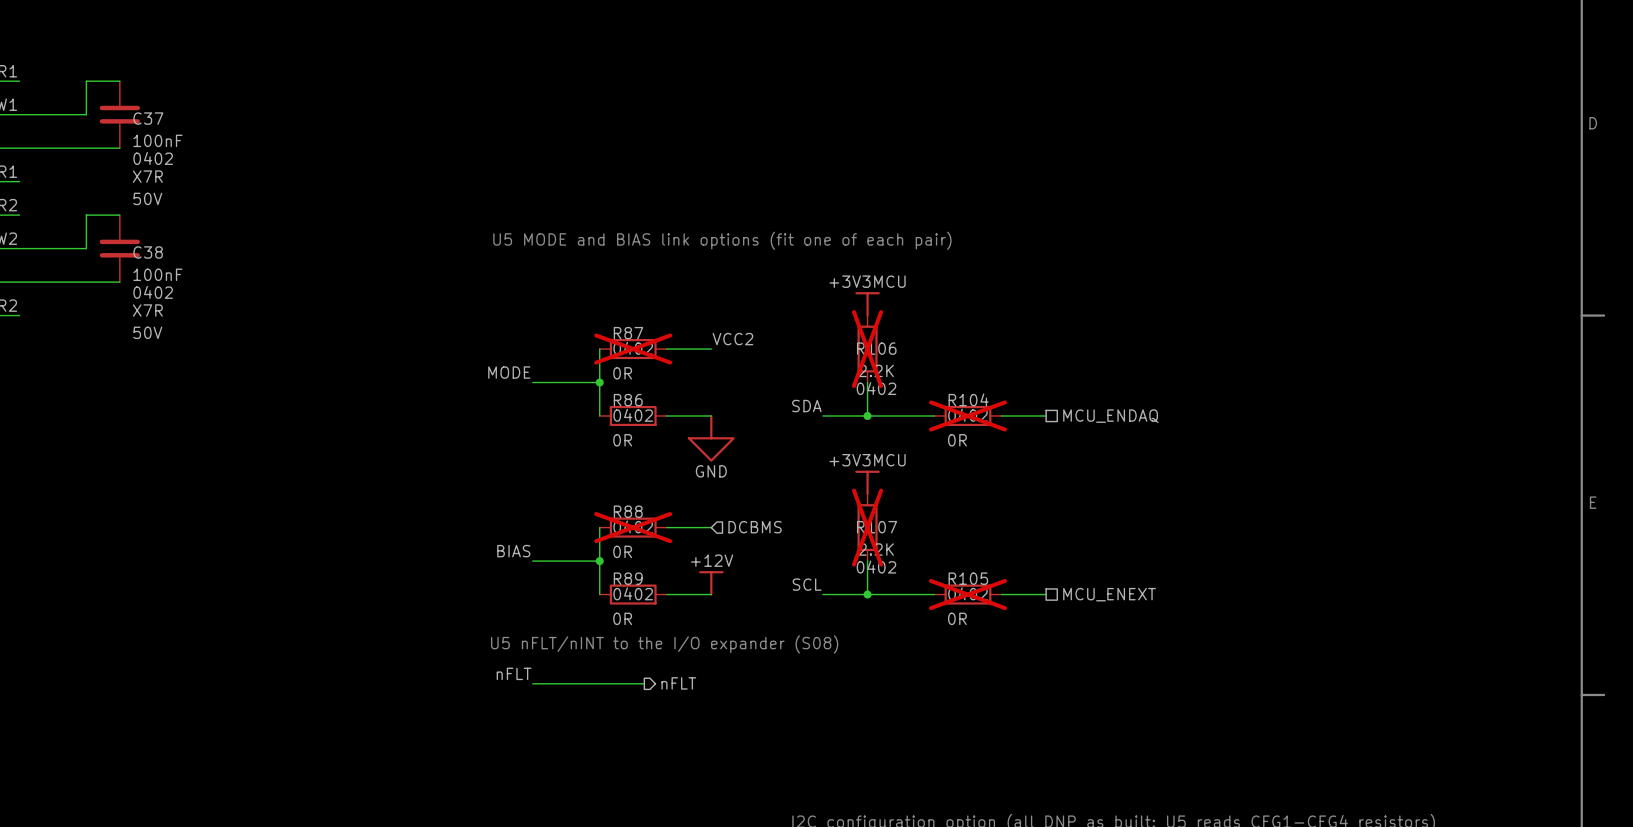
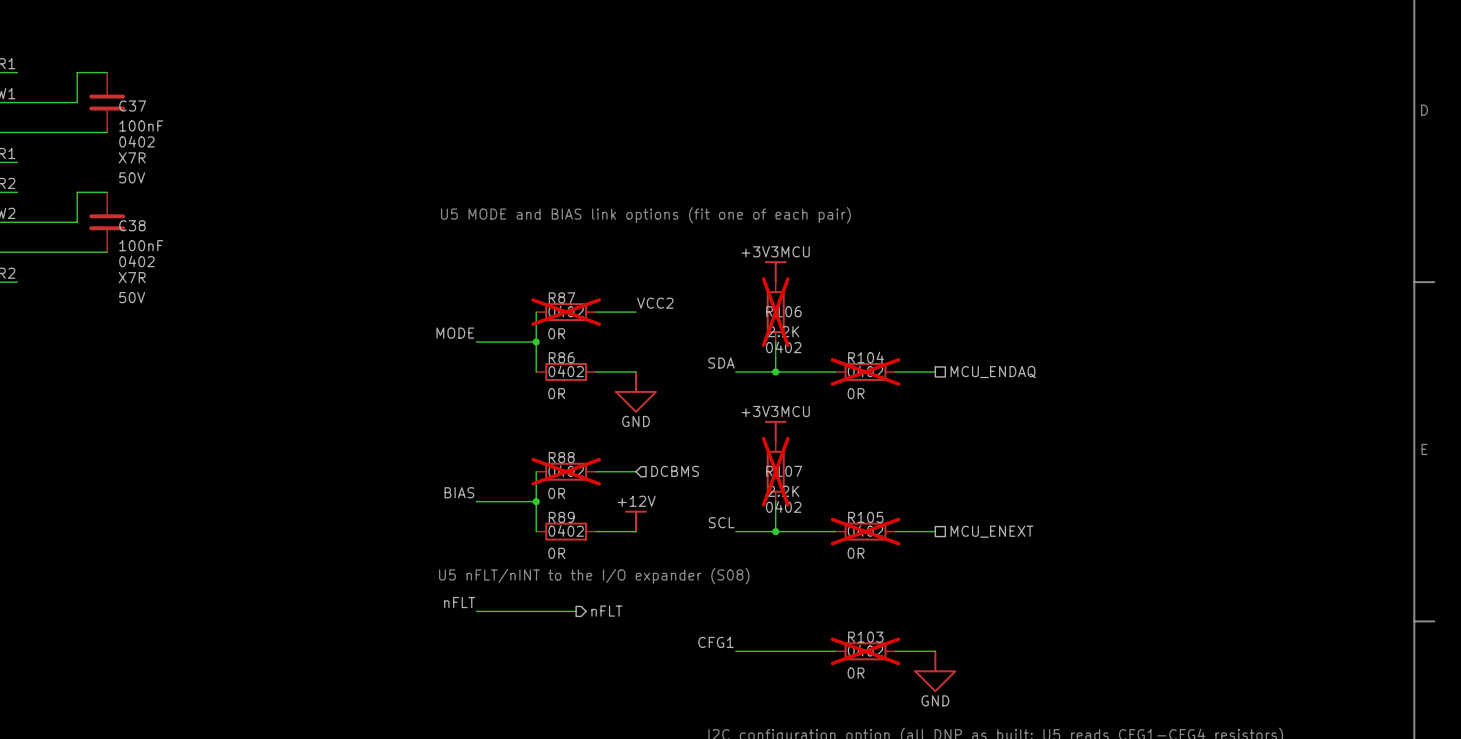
label: none -> CFG1 (715, 642)
wire: none -> (735, 651) (835, 651)
R103: none -> 0R (865, 651)
wire: none -> (895, 651) (935, 651)
power symbol: none -> GND (935, 671)

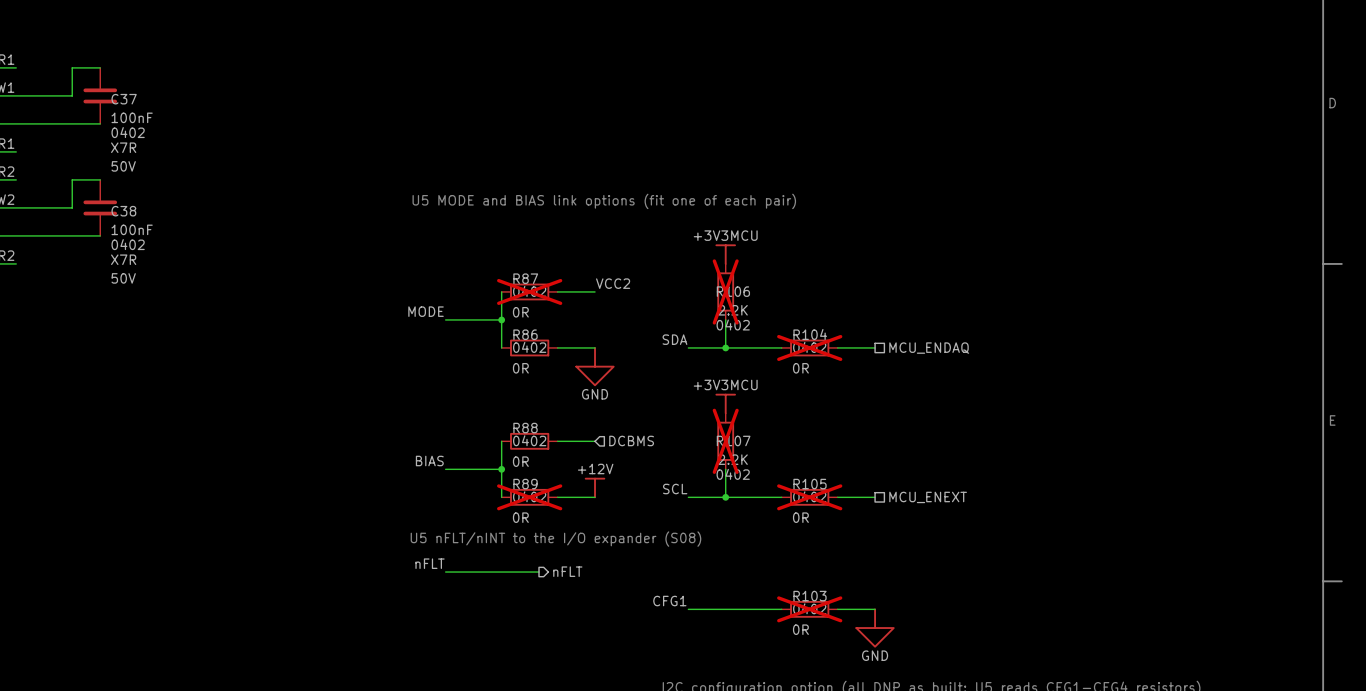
R88 do-not-place cross: (566, 471) -> none
R89 do-not-place cross: none -> (529, 497)

